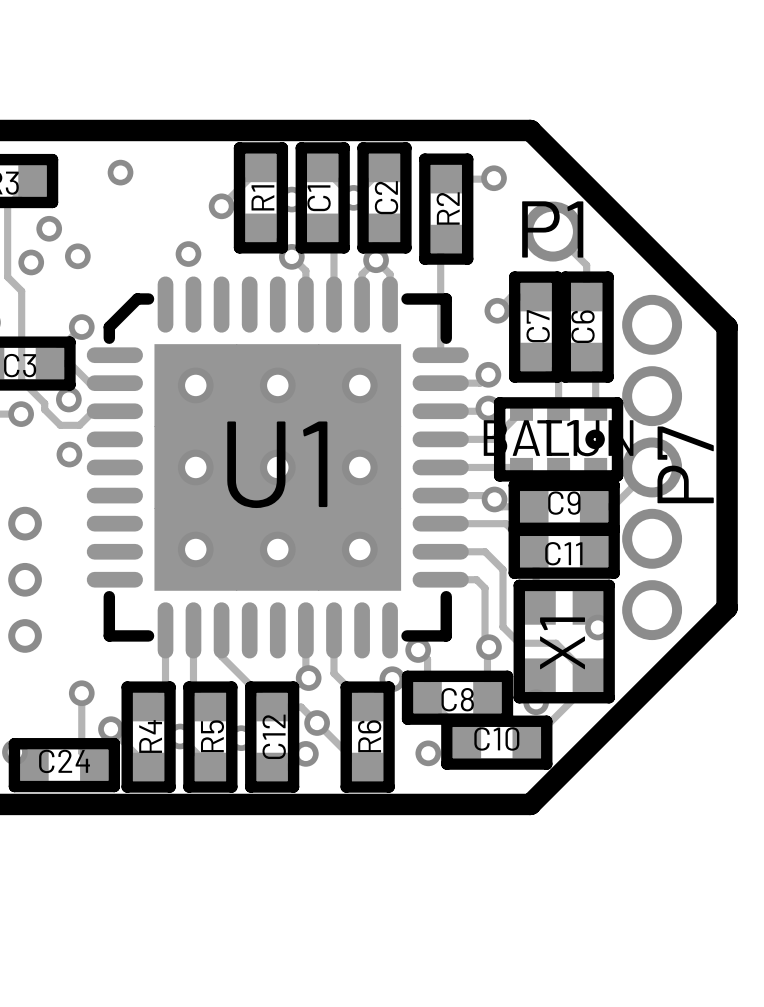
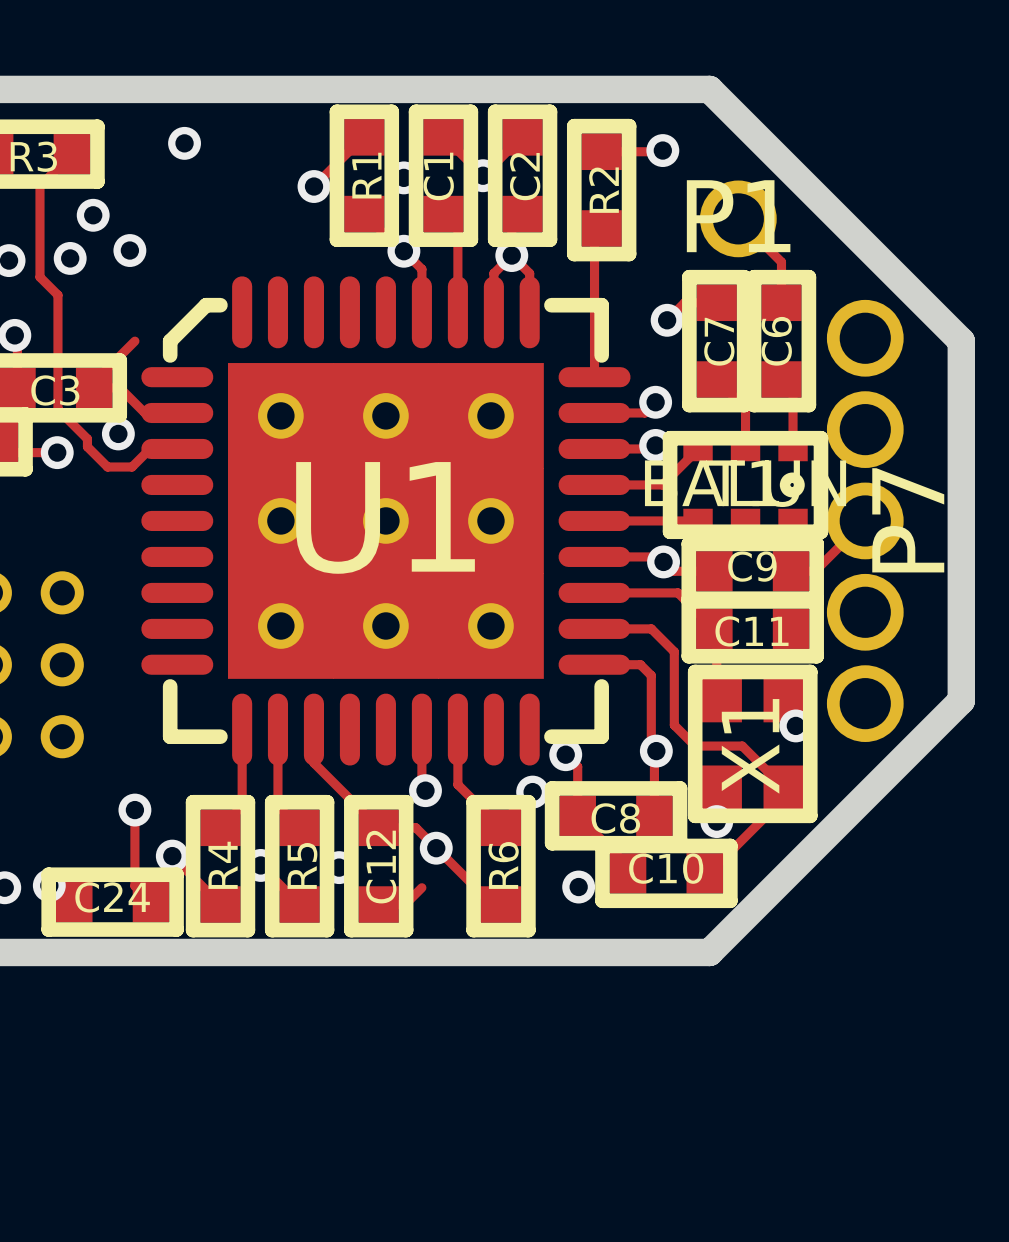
via: (188, 254) -> none
via: (81, 327) -> none
via: (69, 454) -> none
via: (305, 753) -> none

